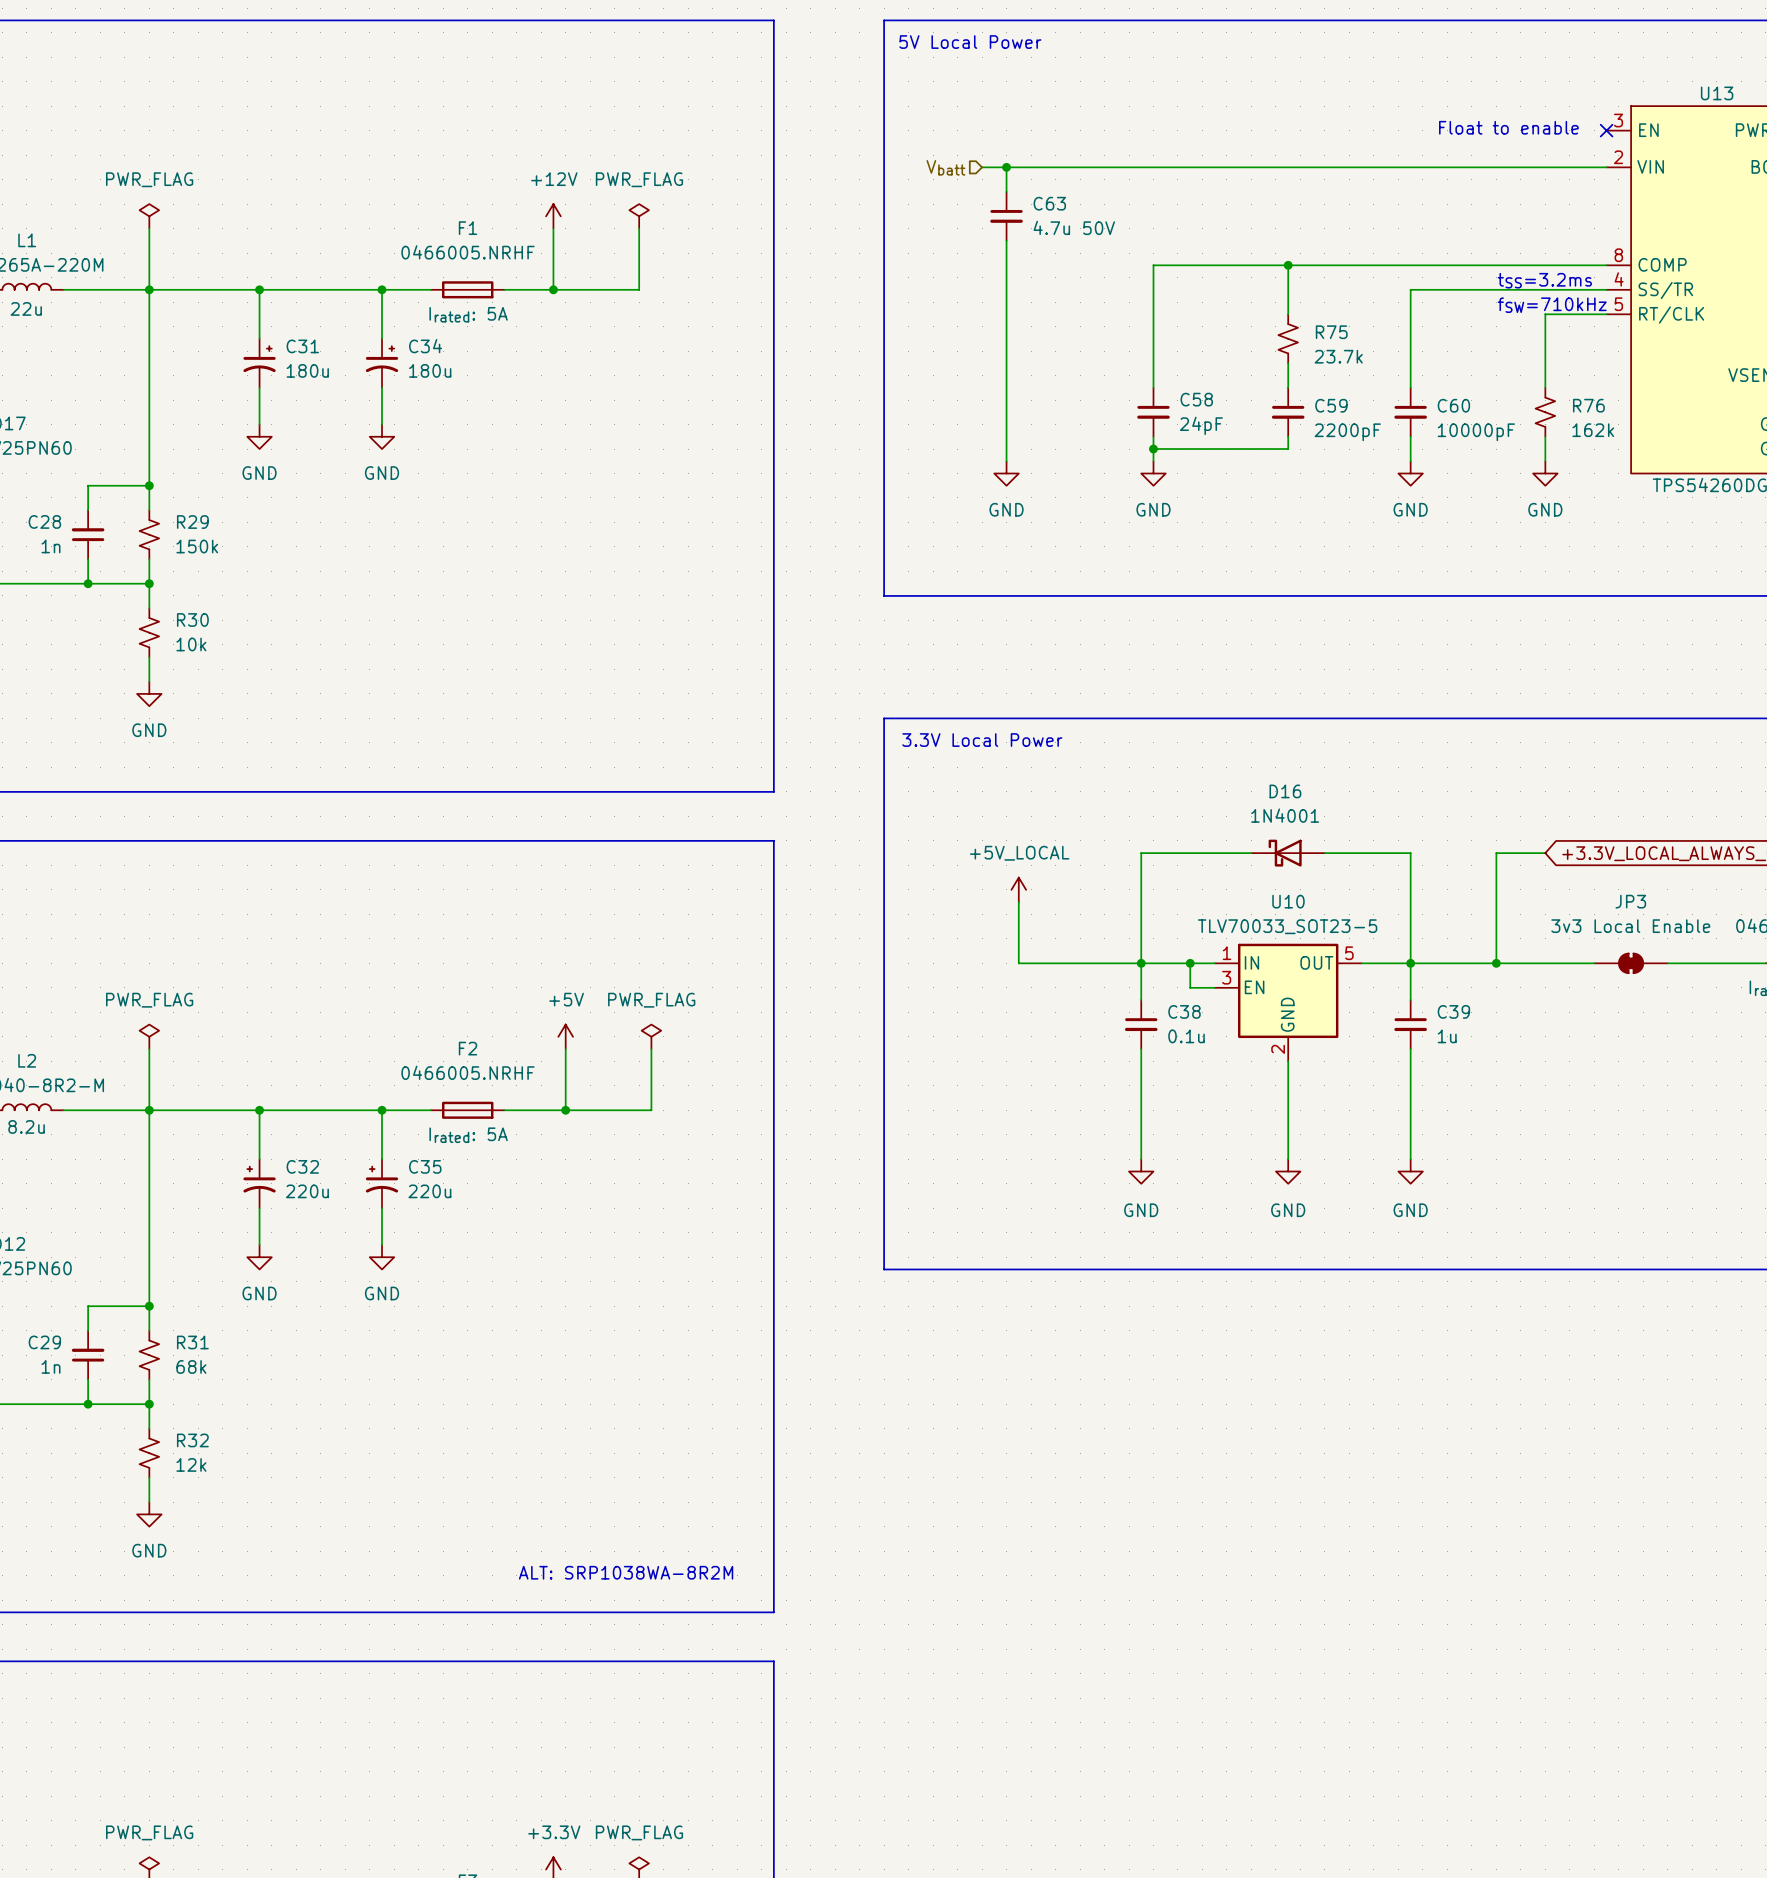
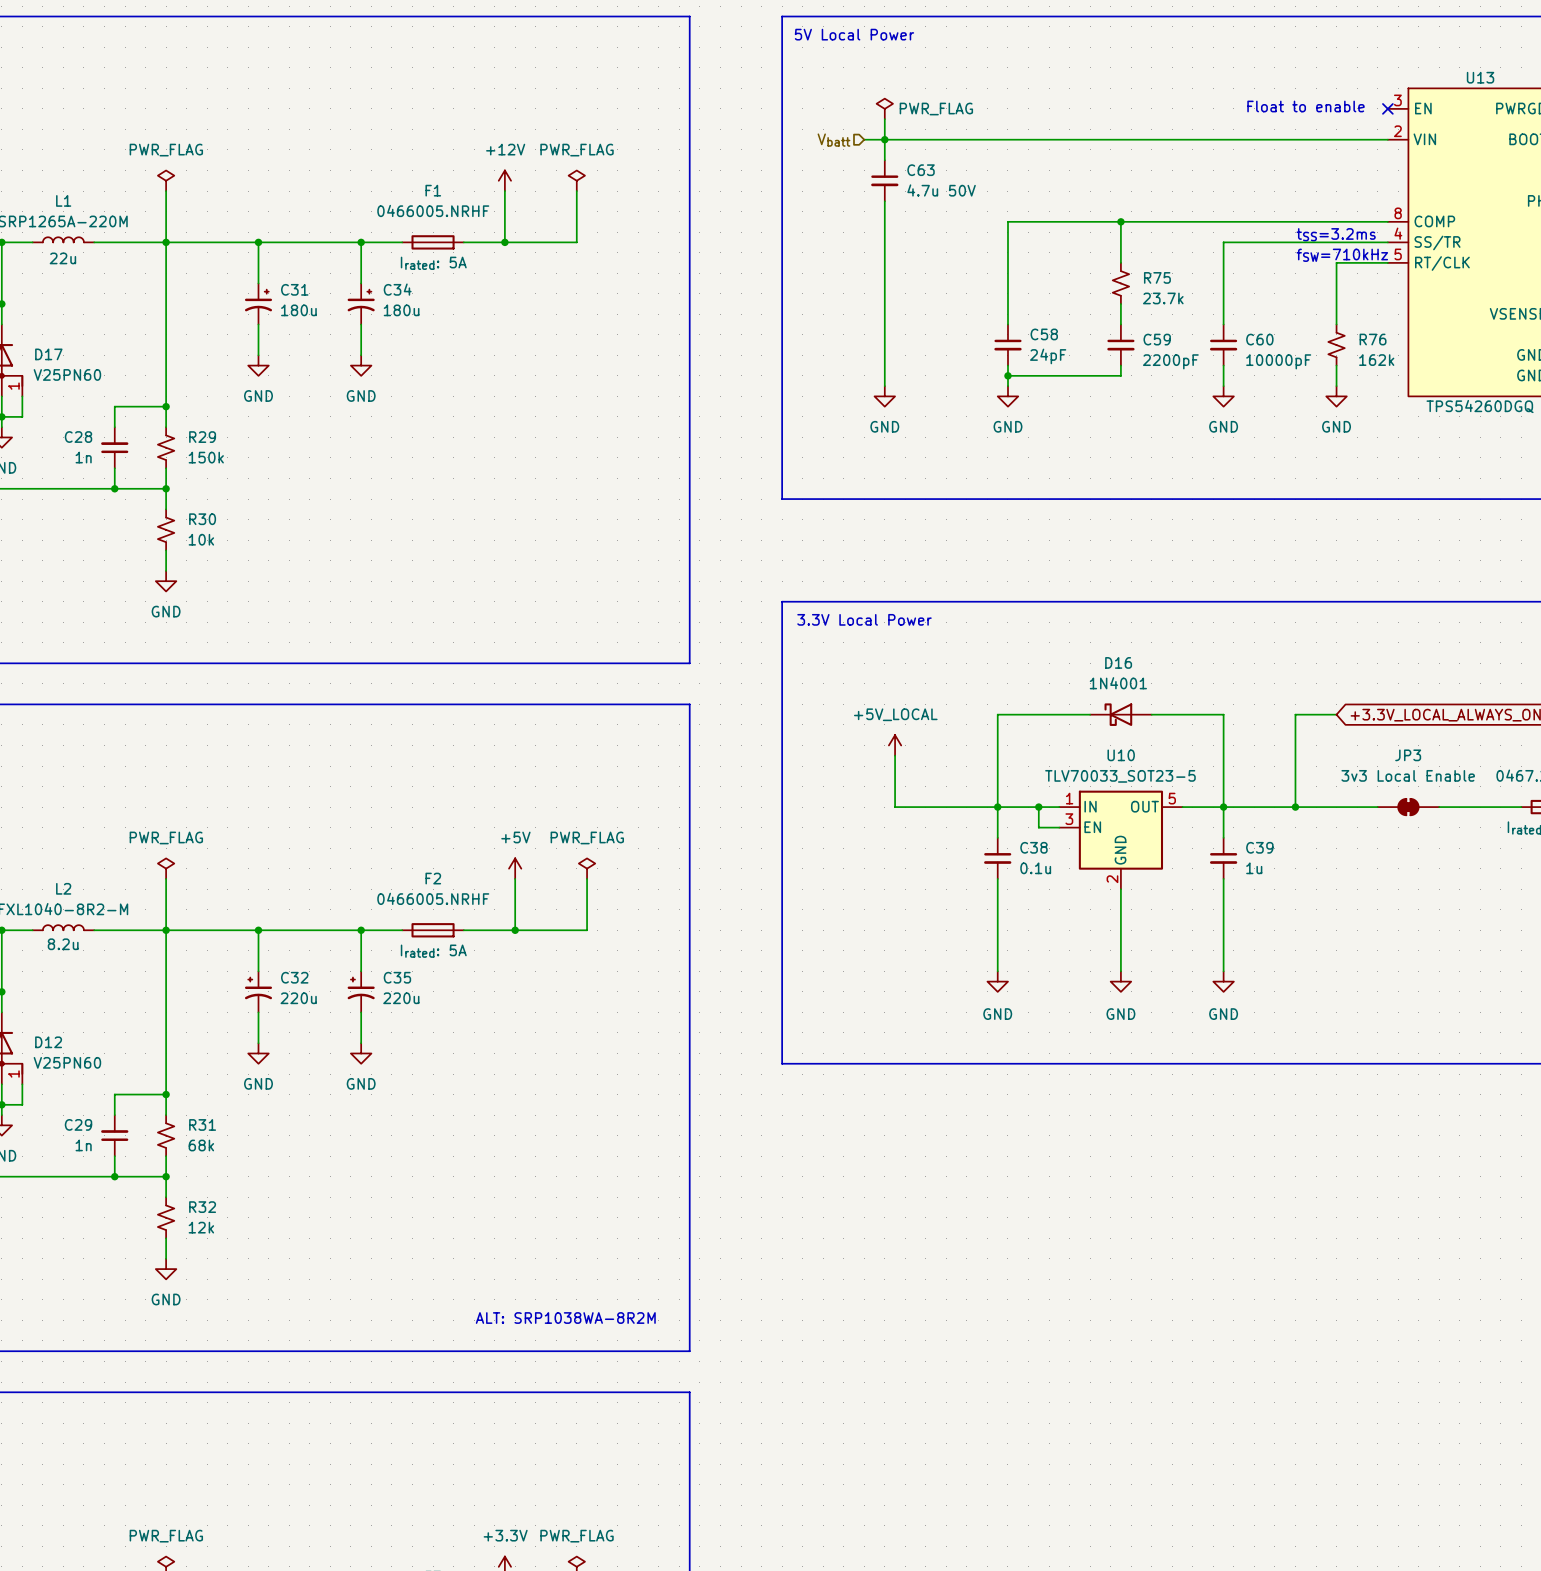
power symbol: none -> PWR_FLAG (884, 108)
wire: none -> (884, 119) (884, 139)

